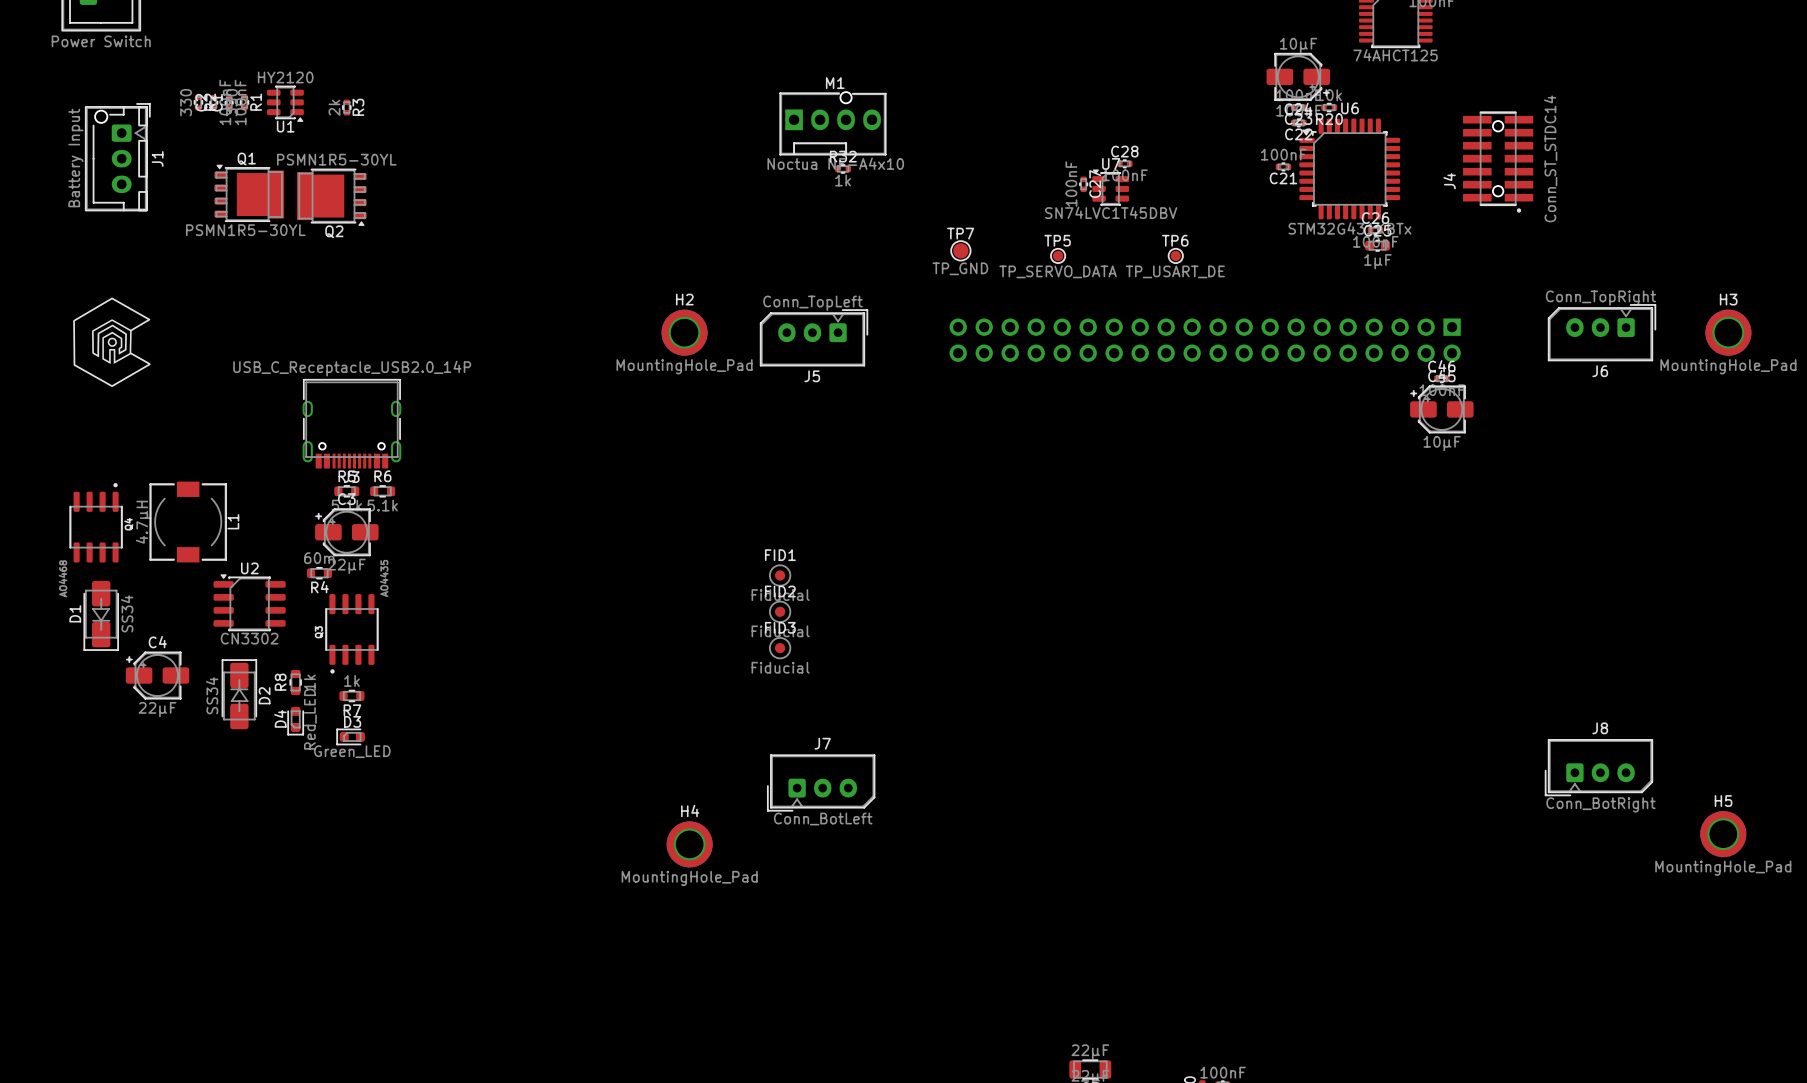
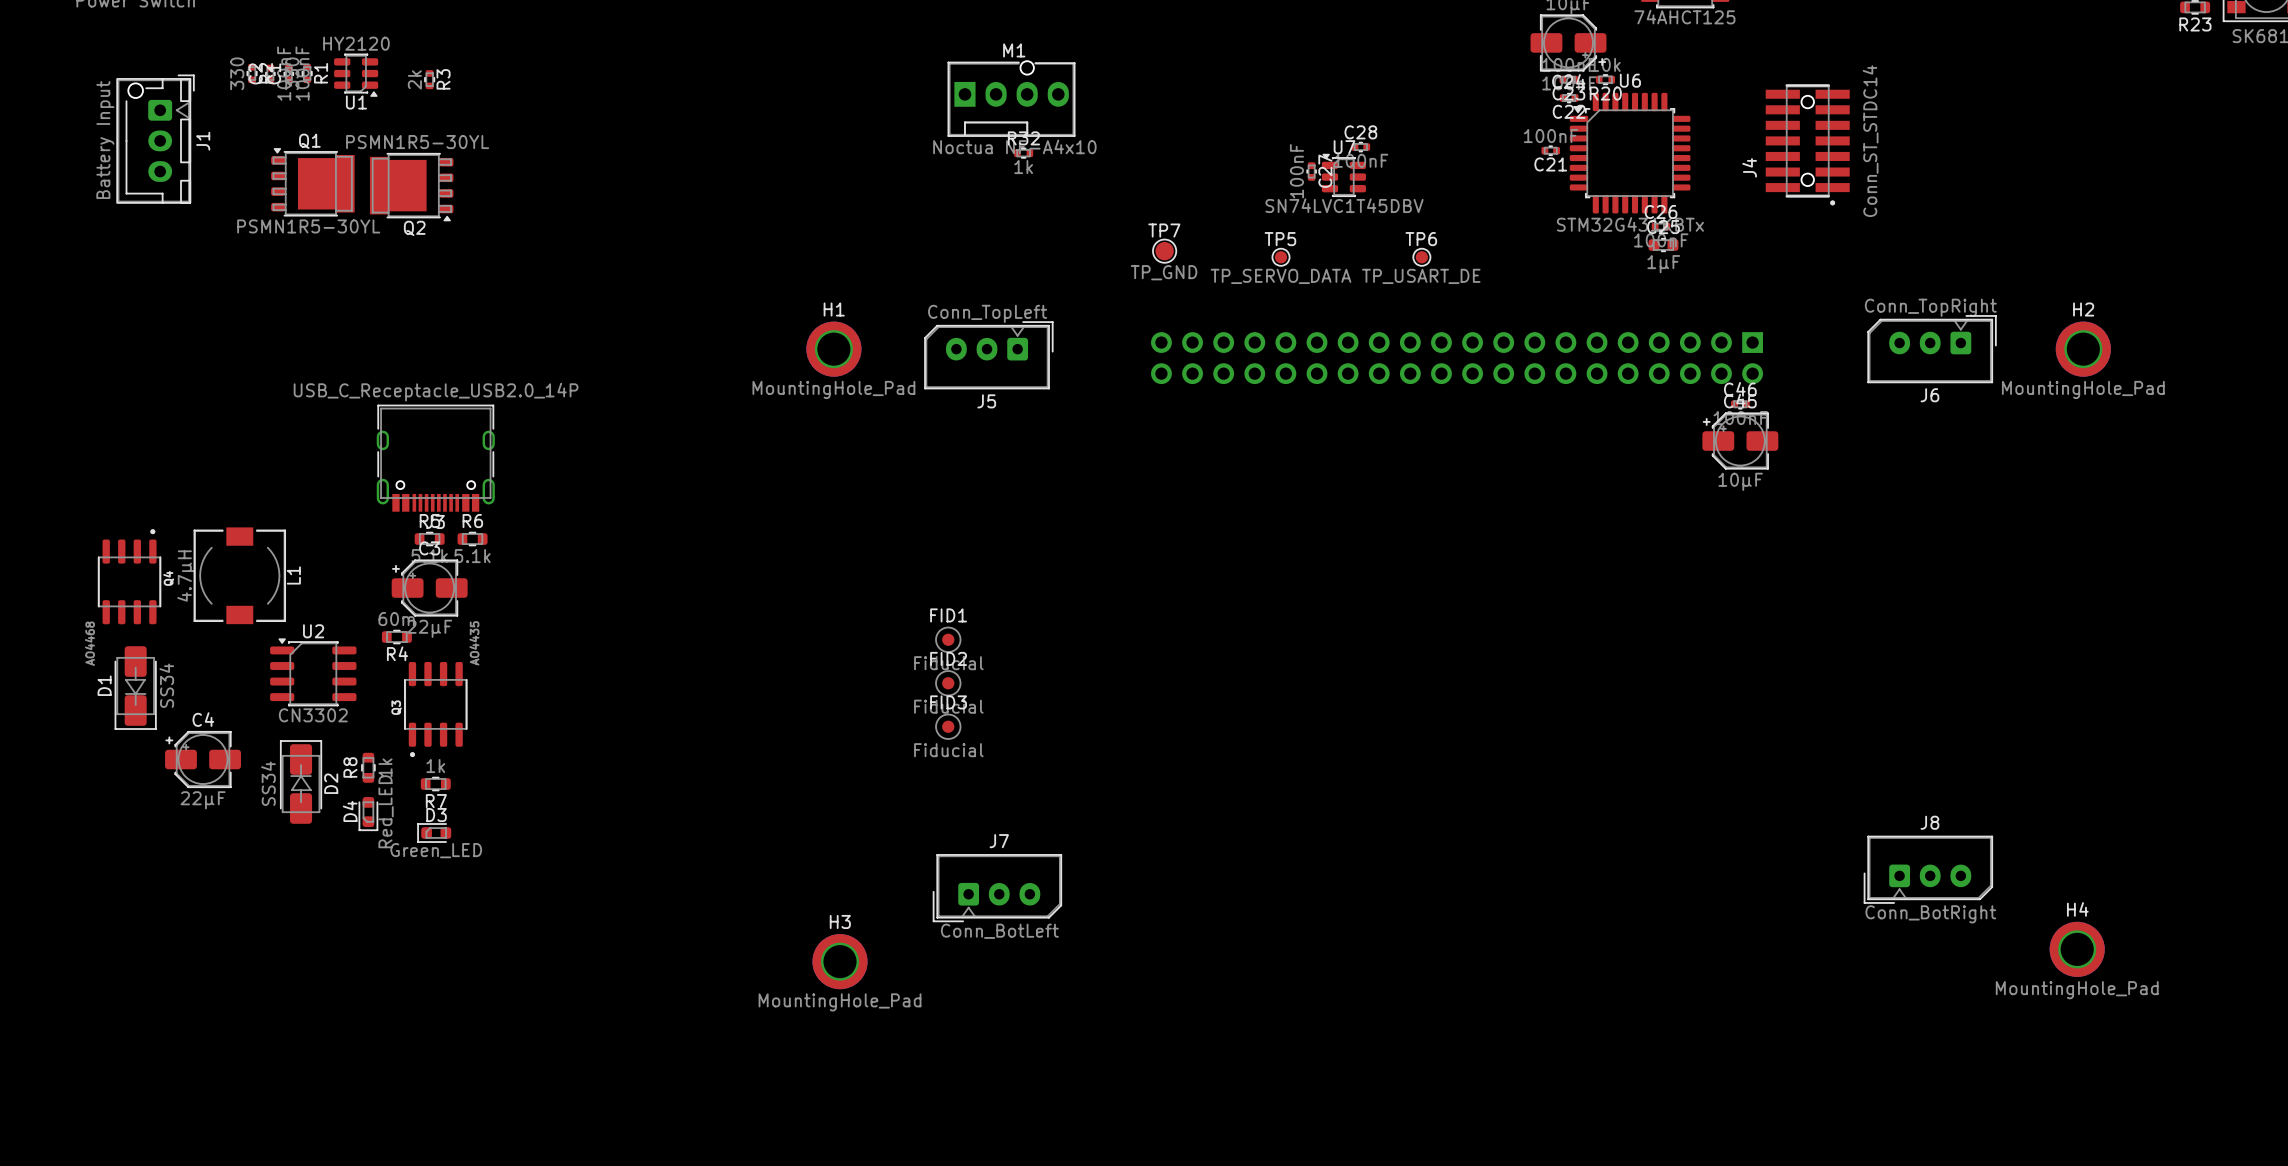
drawing: [73, 297, 151, 387] -> none
H2 name: H2 (684, 299) -> H1 (834, 309)
H3 name: H3 (1728, 299) -> H2 (2083, 309)
H5 name: H5 (1723, 801) -> H4 (2077, 909)
H4 name: H4 (690, 811) -> H3 (840, 921)

